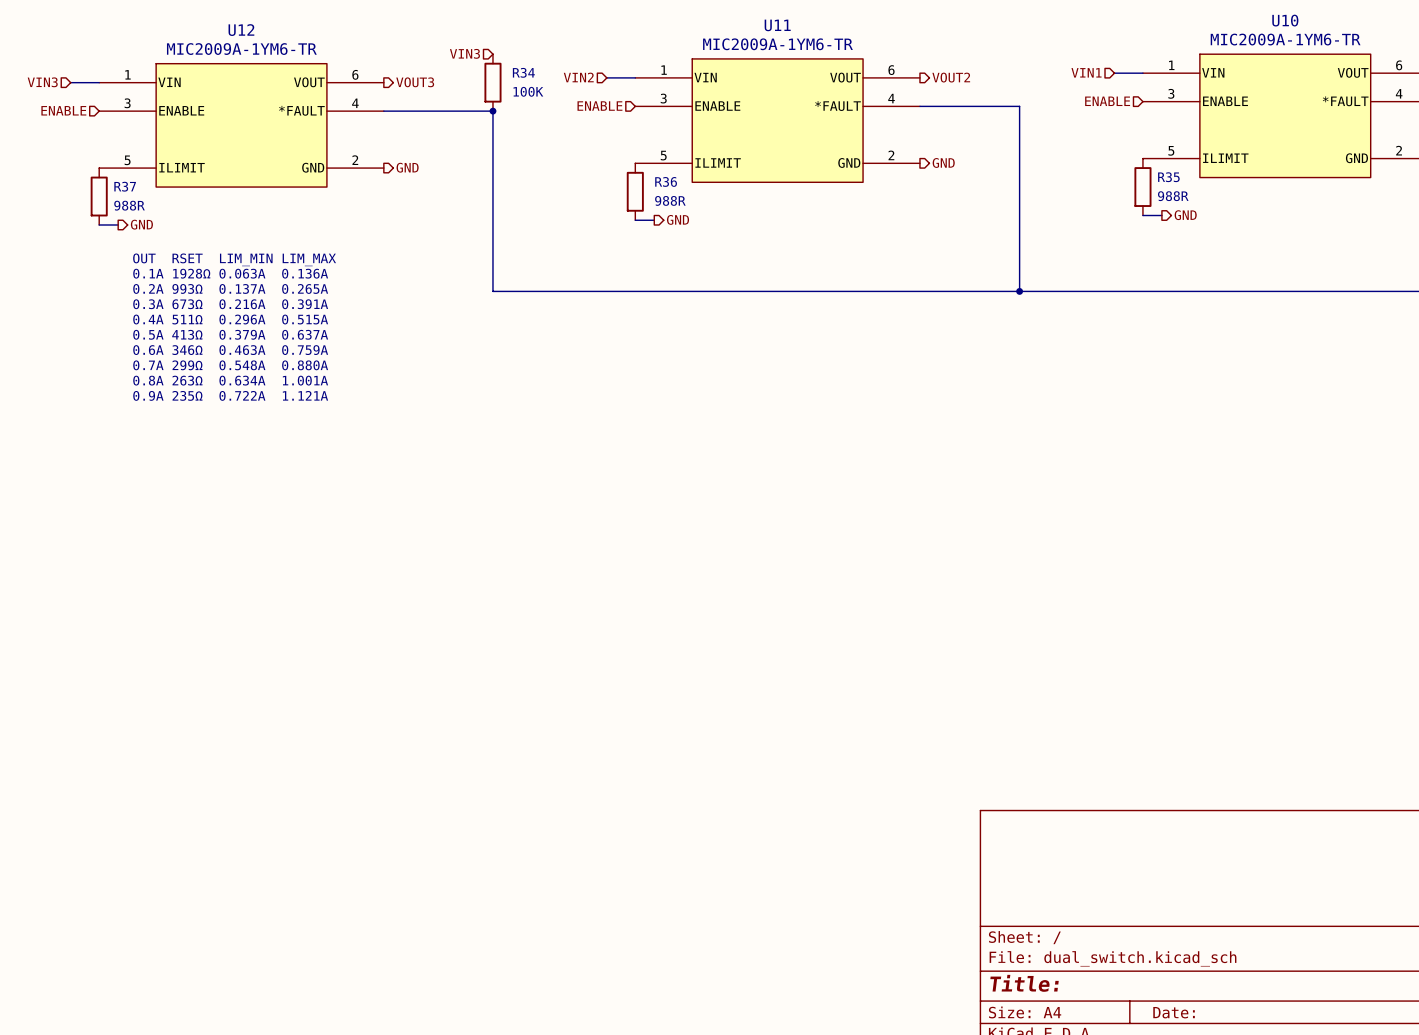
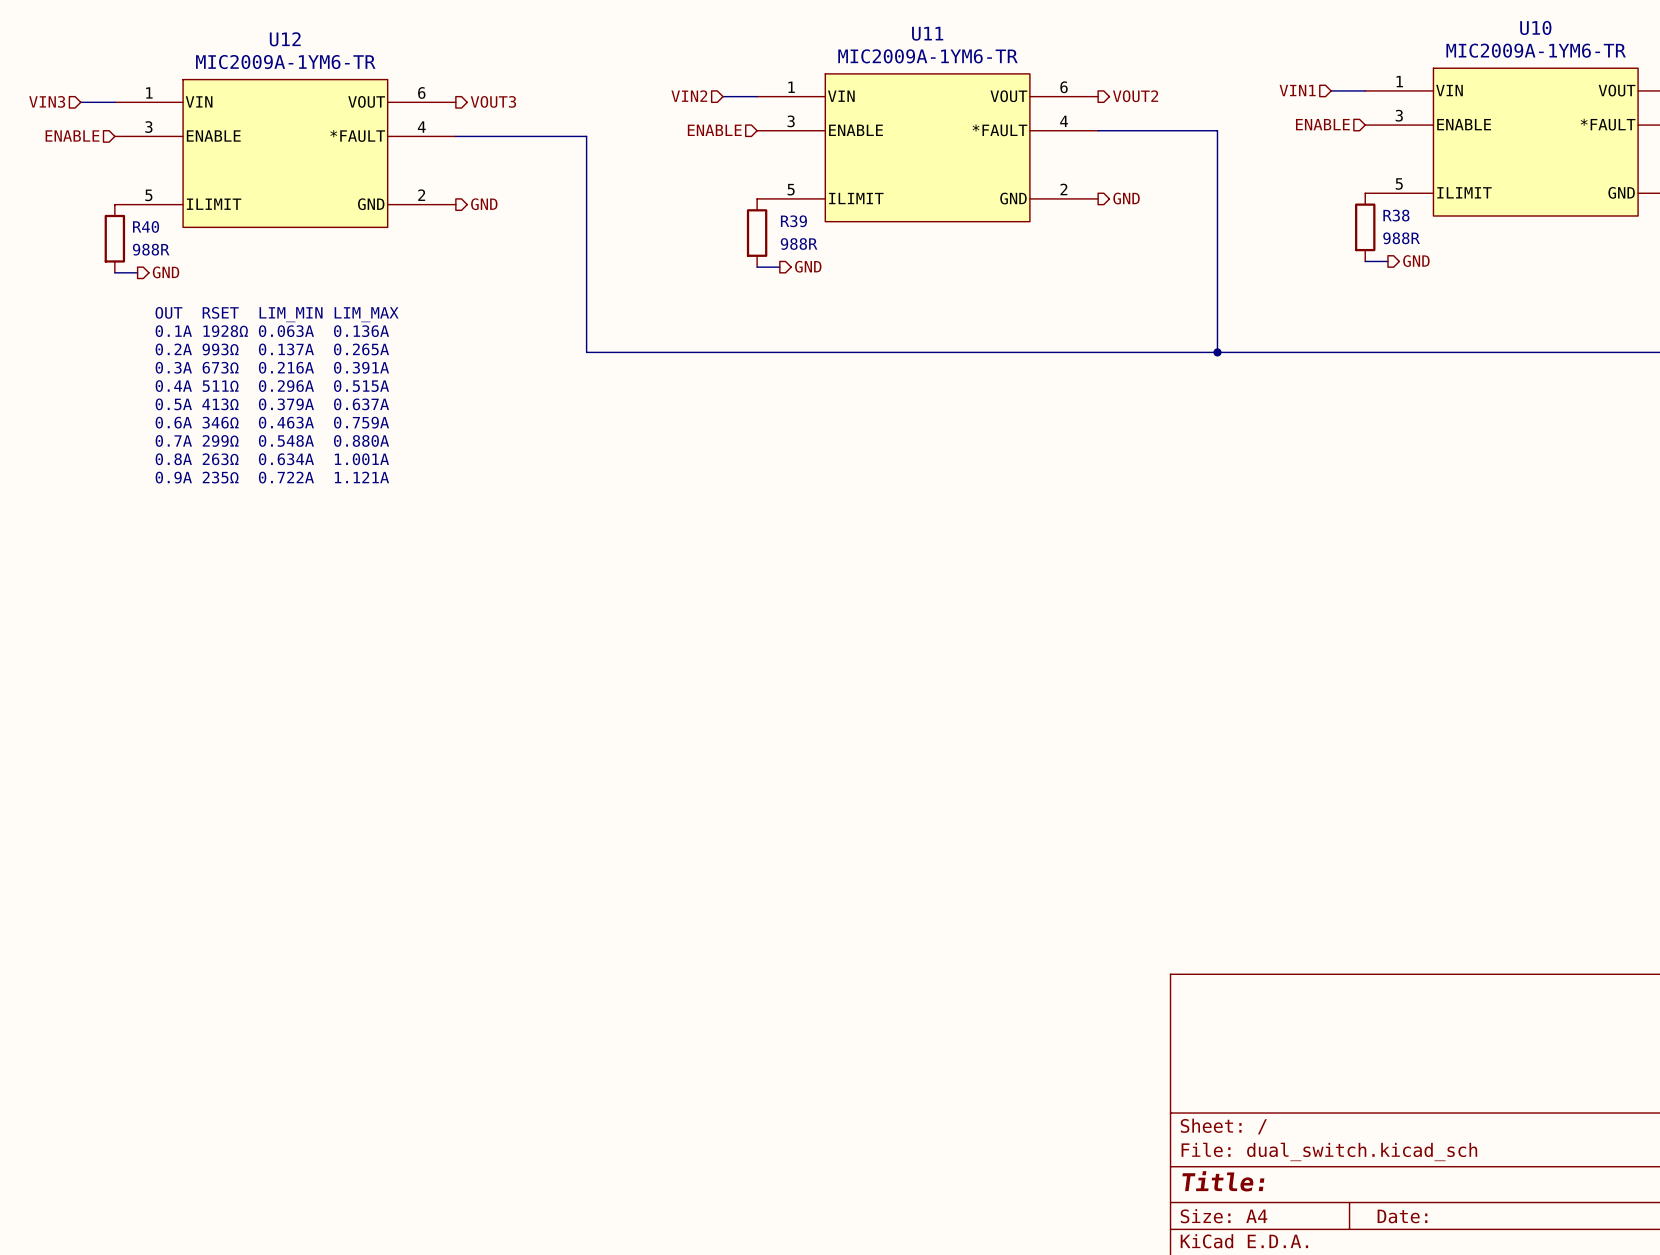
hierarchical label: VIN3 (464, 53) -> none
R34: 100K (492, 82) -> none
junction: (492, 111) -> none
R35 name: R35 (1168, 177) -> R38 (1396, 215)
R36 name: R36 (666, 181) -> R39 (793, 221)
R37 name: R37 (125, 186) -> R40 (146, 226)

